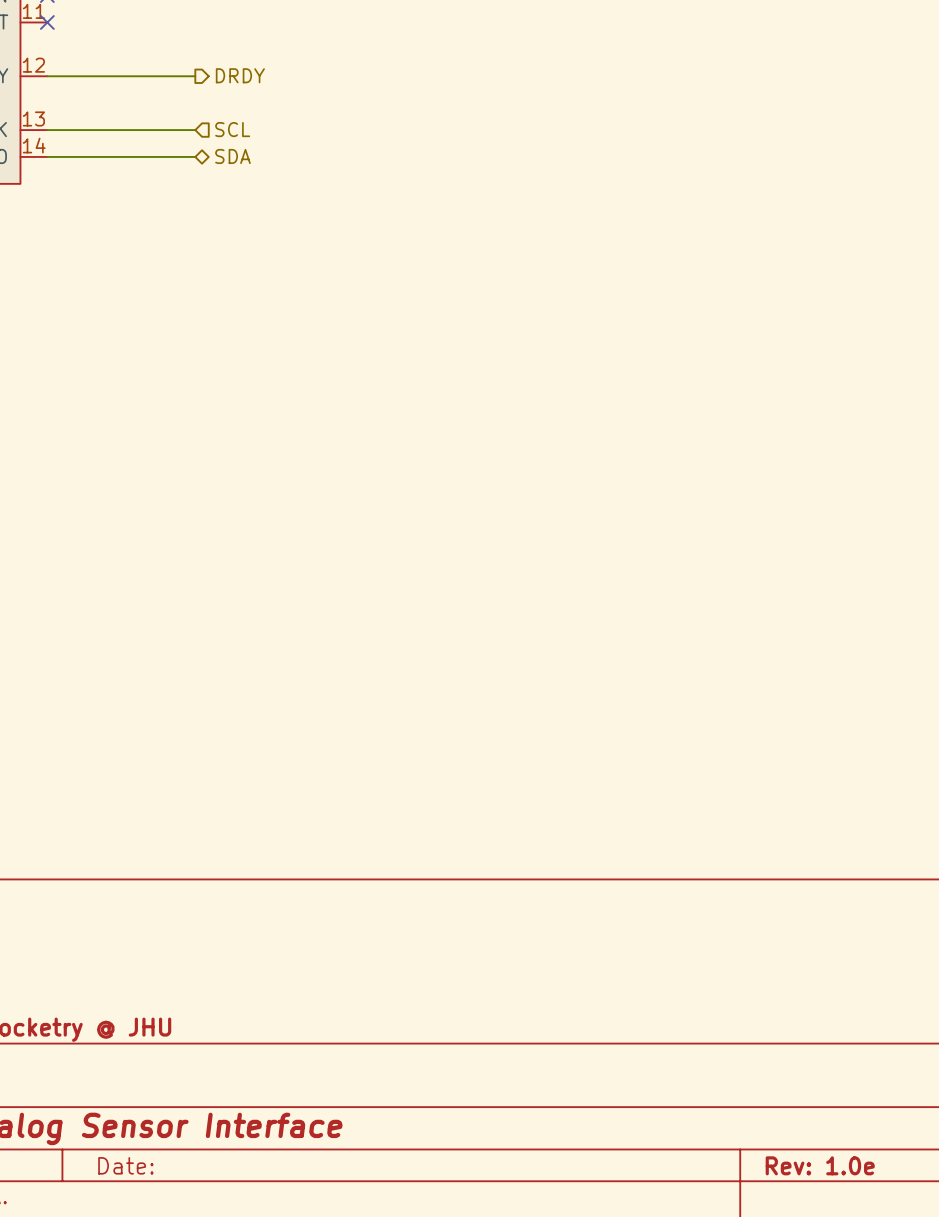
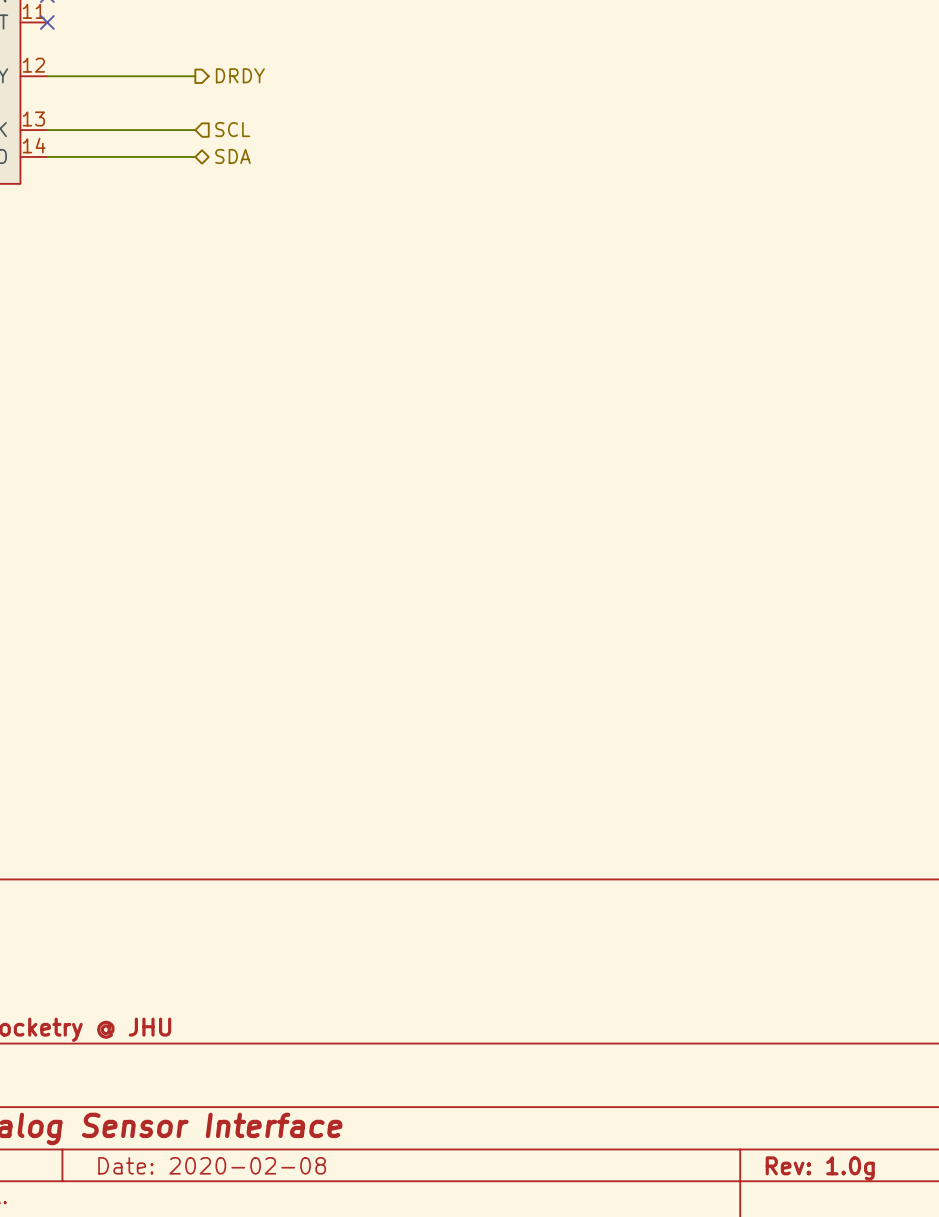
title block: Date: (125, 1165) -> Date: 2020-02-08 (212, 1165)
title block: Rev: 1.0e (820, 1165) -> Rev: 1.0g (820, 1168)

